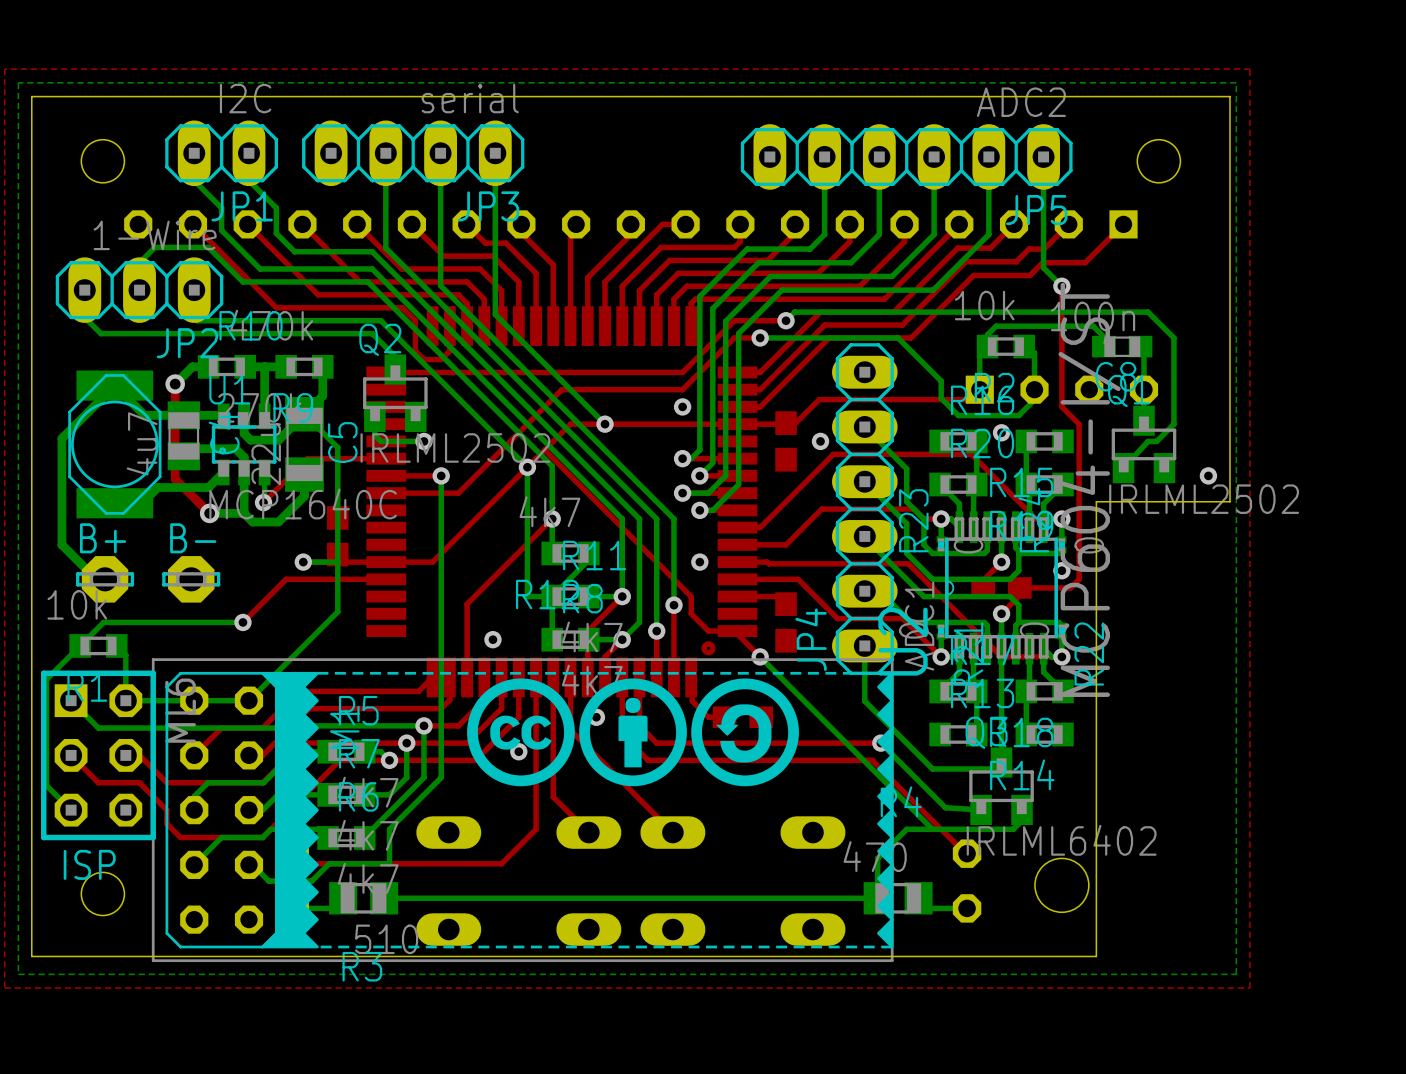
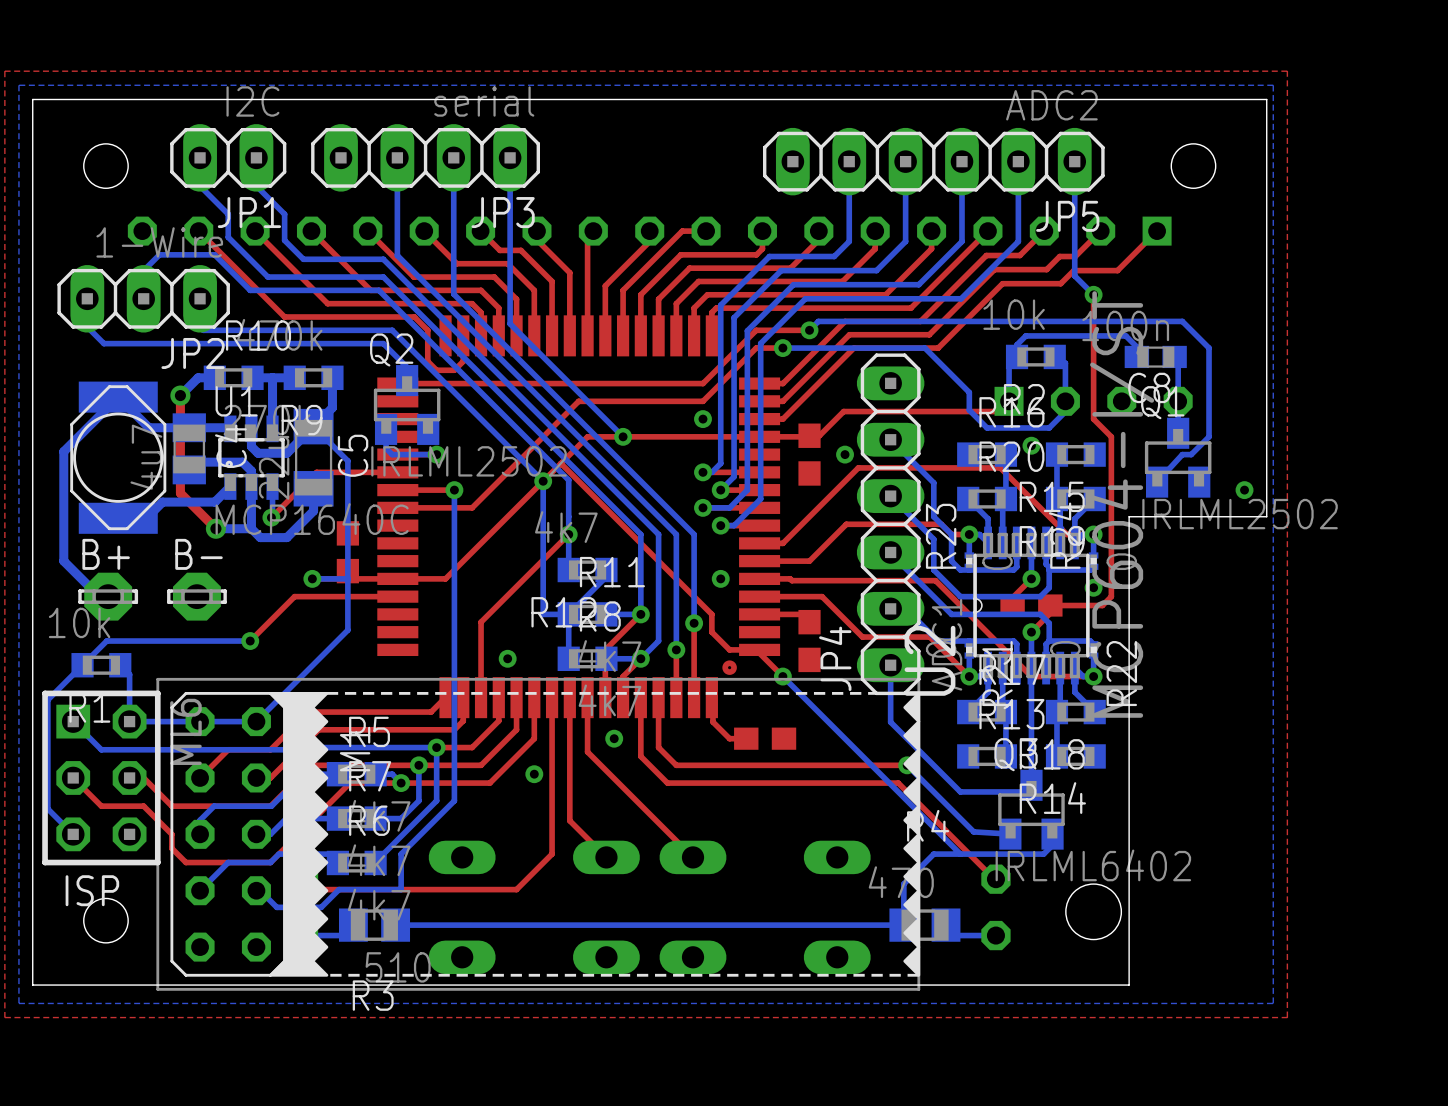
drawing: [467, 678, 799, 787] -> none

